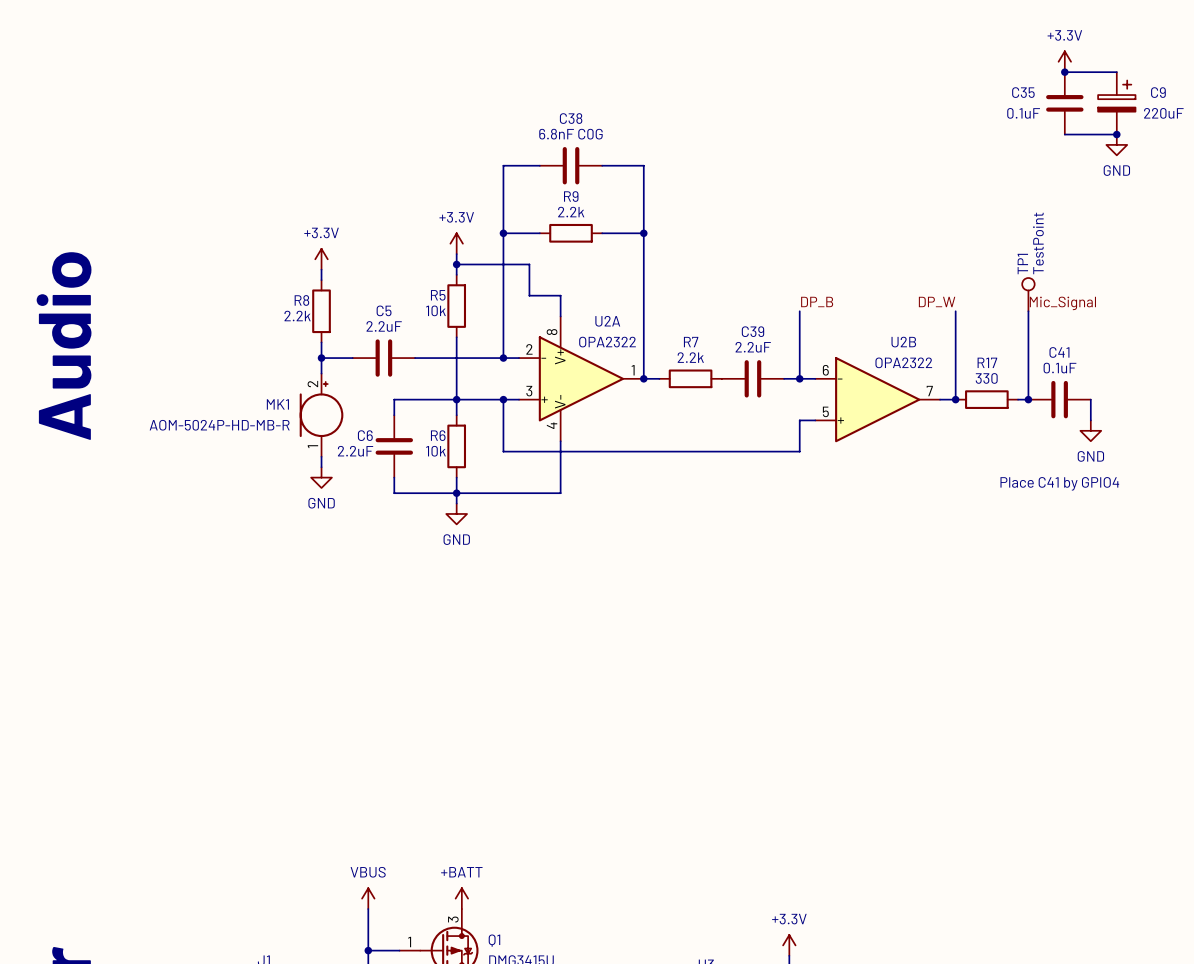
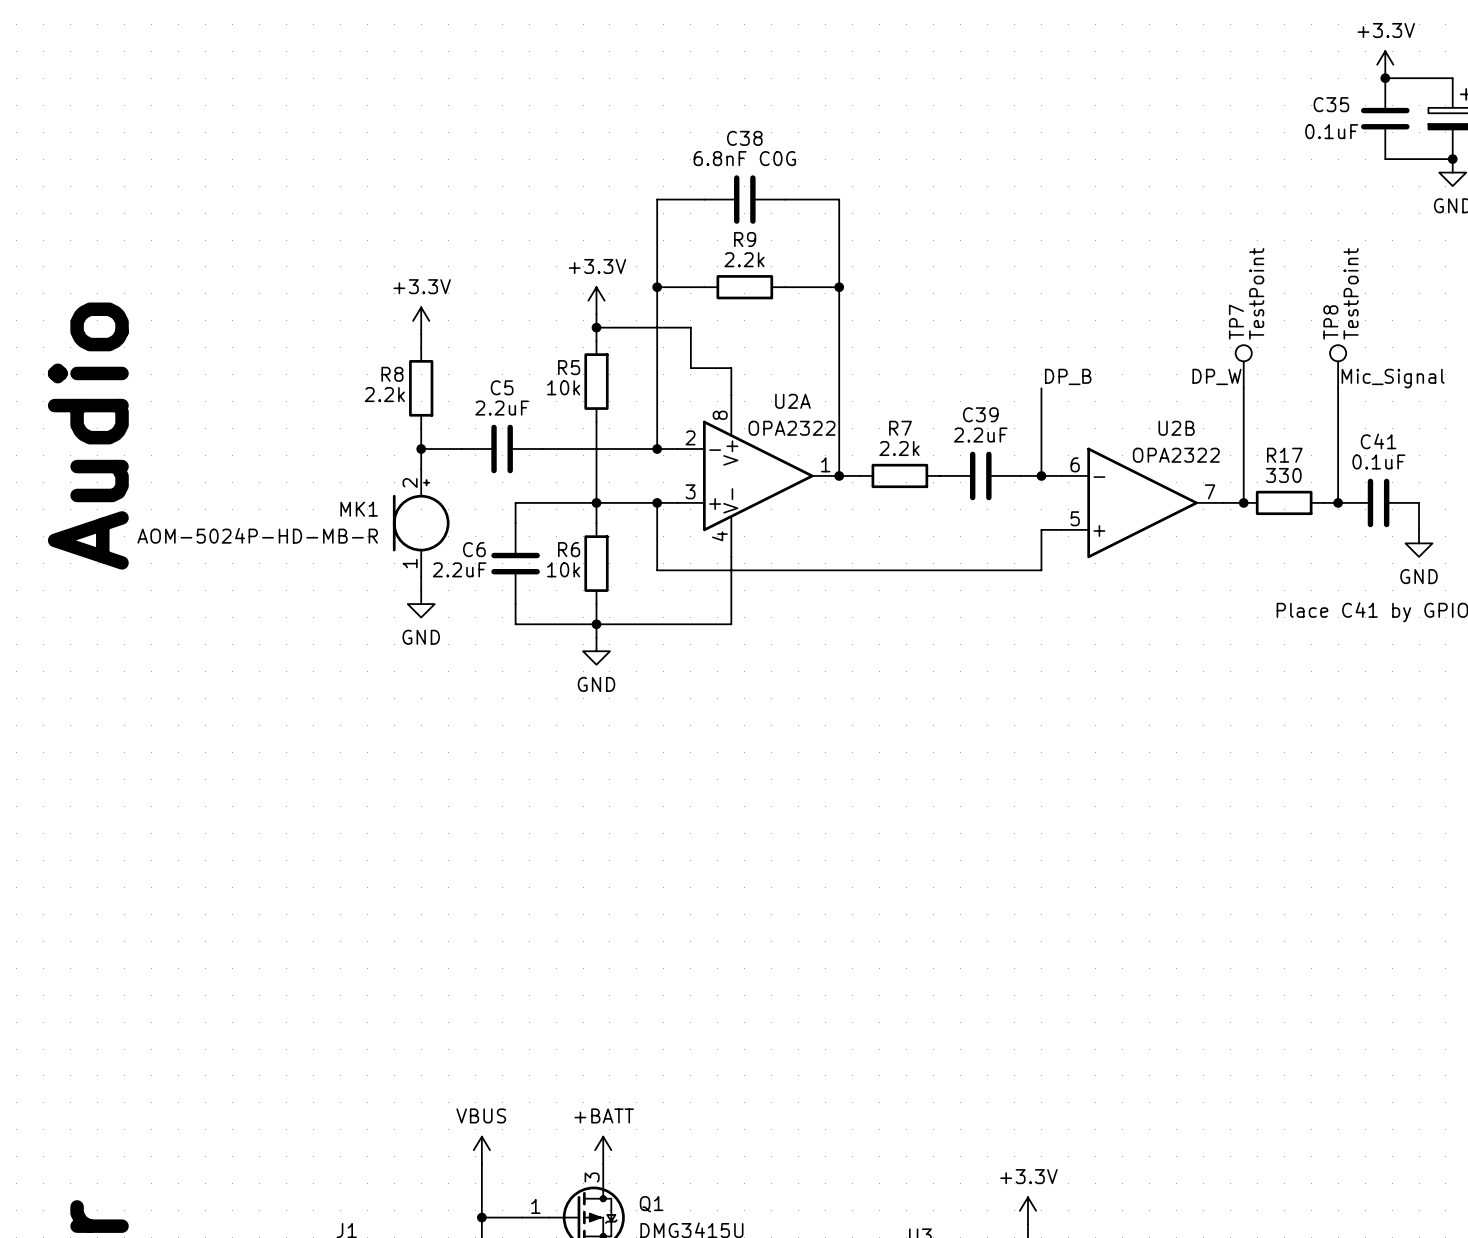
TP1 name: TP1 (1022, 264) -> TP8 (1330, 322)
TP7: none -> TestPoint (1243, 366)

